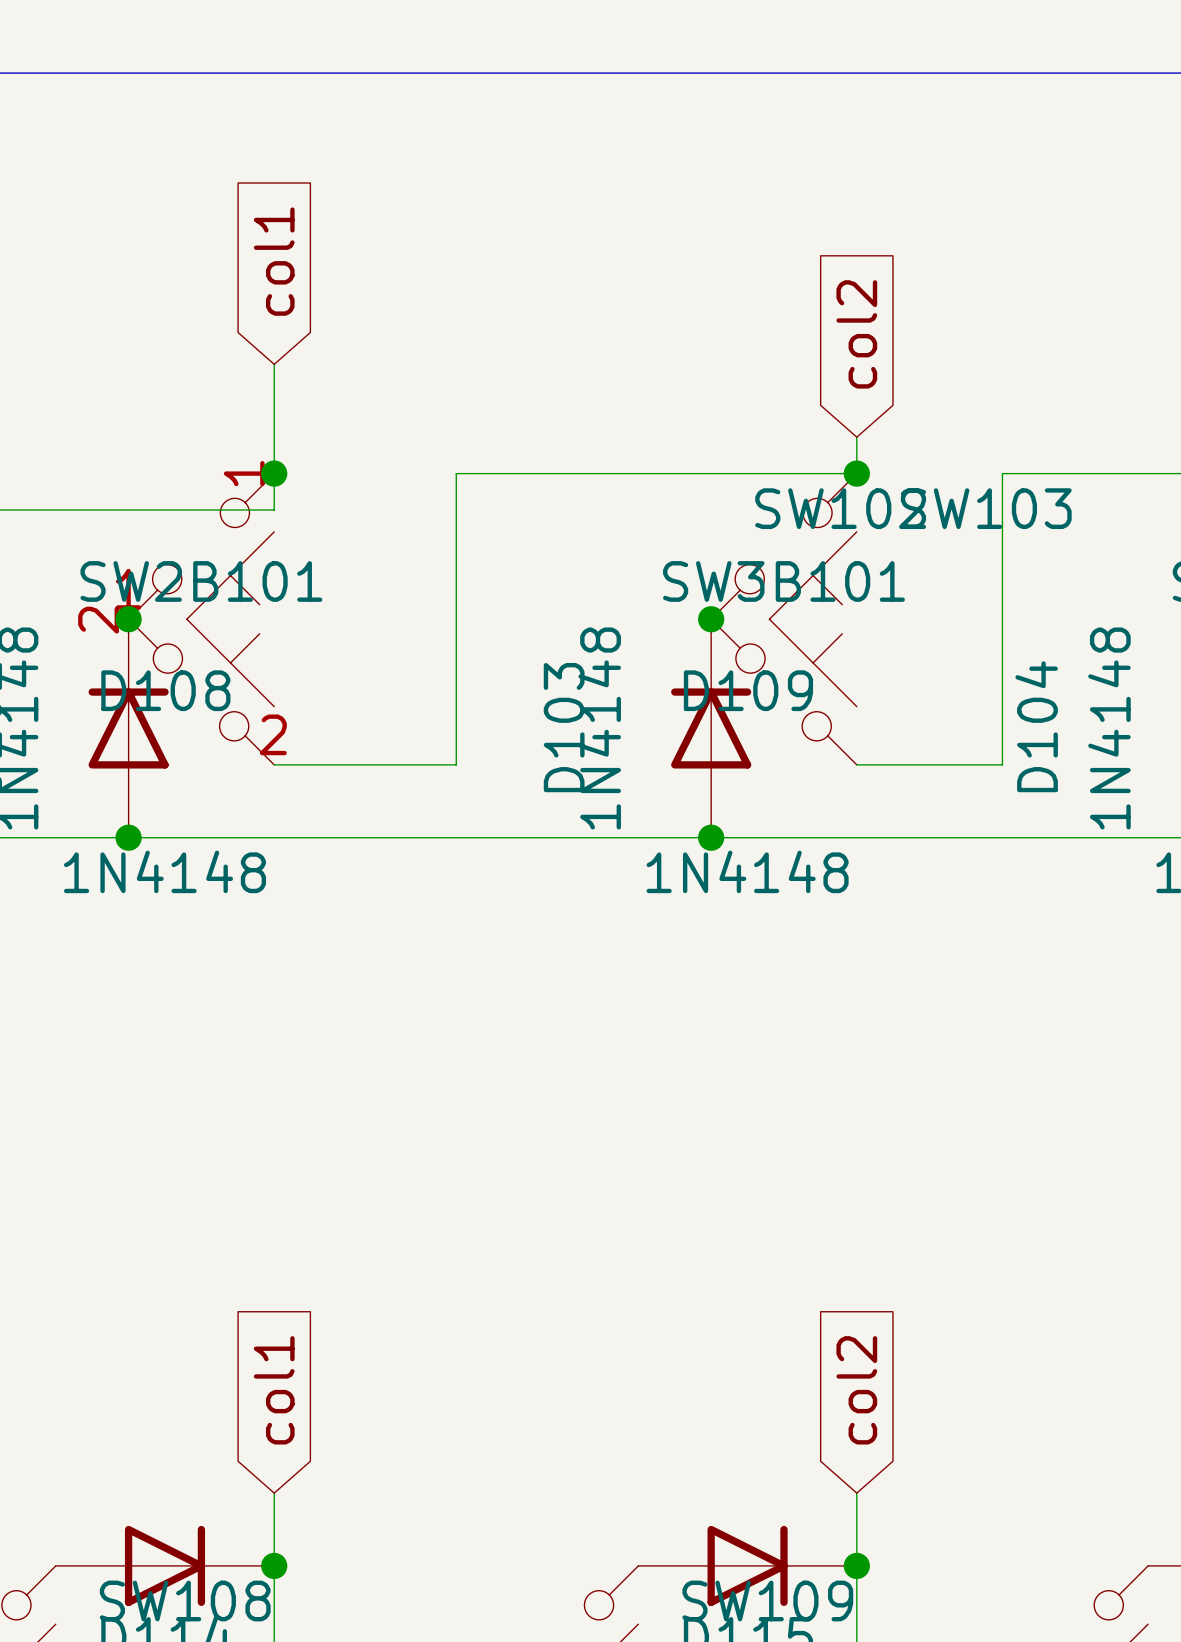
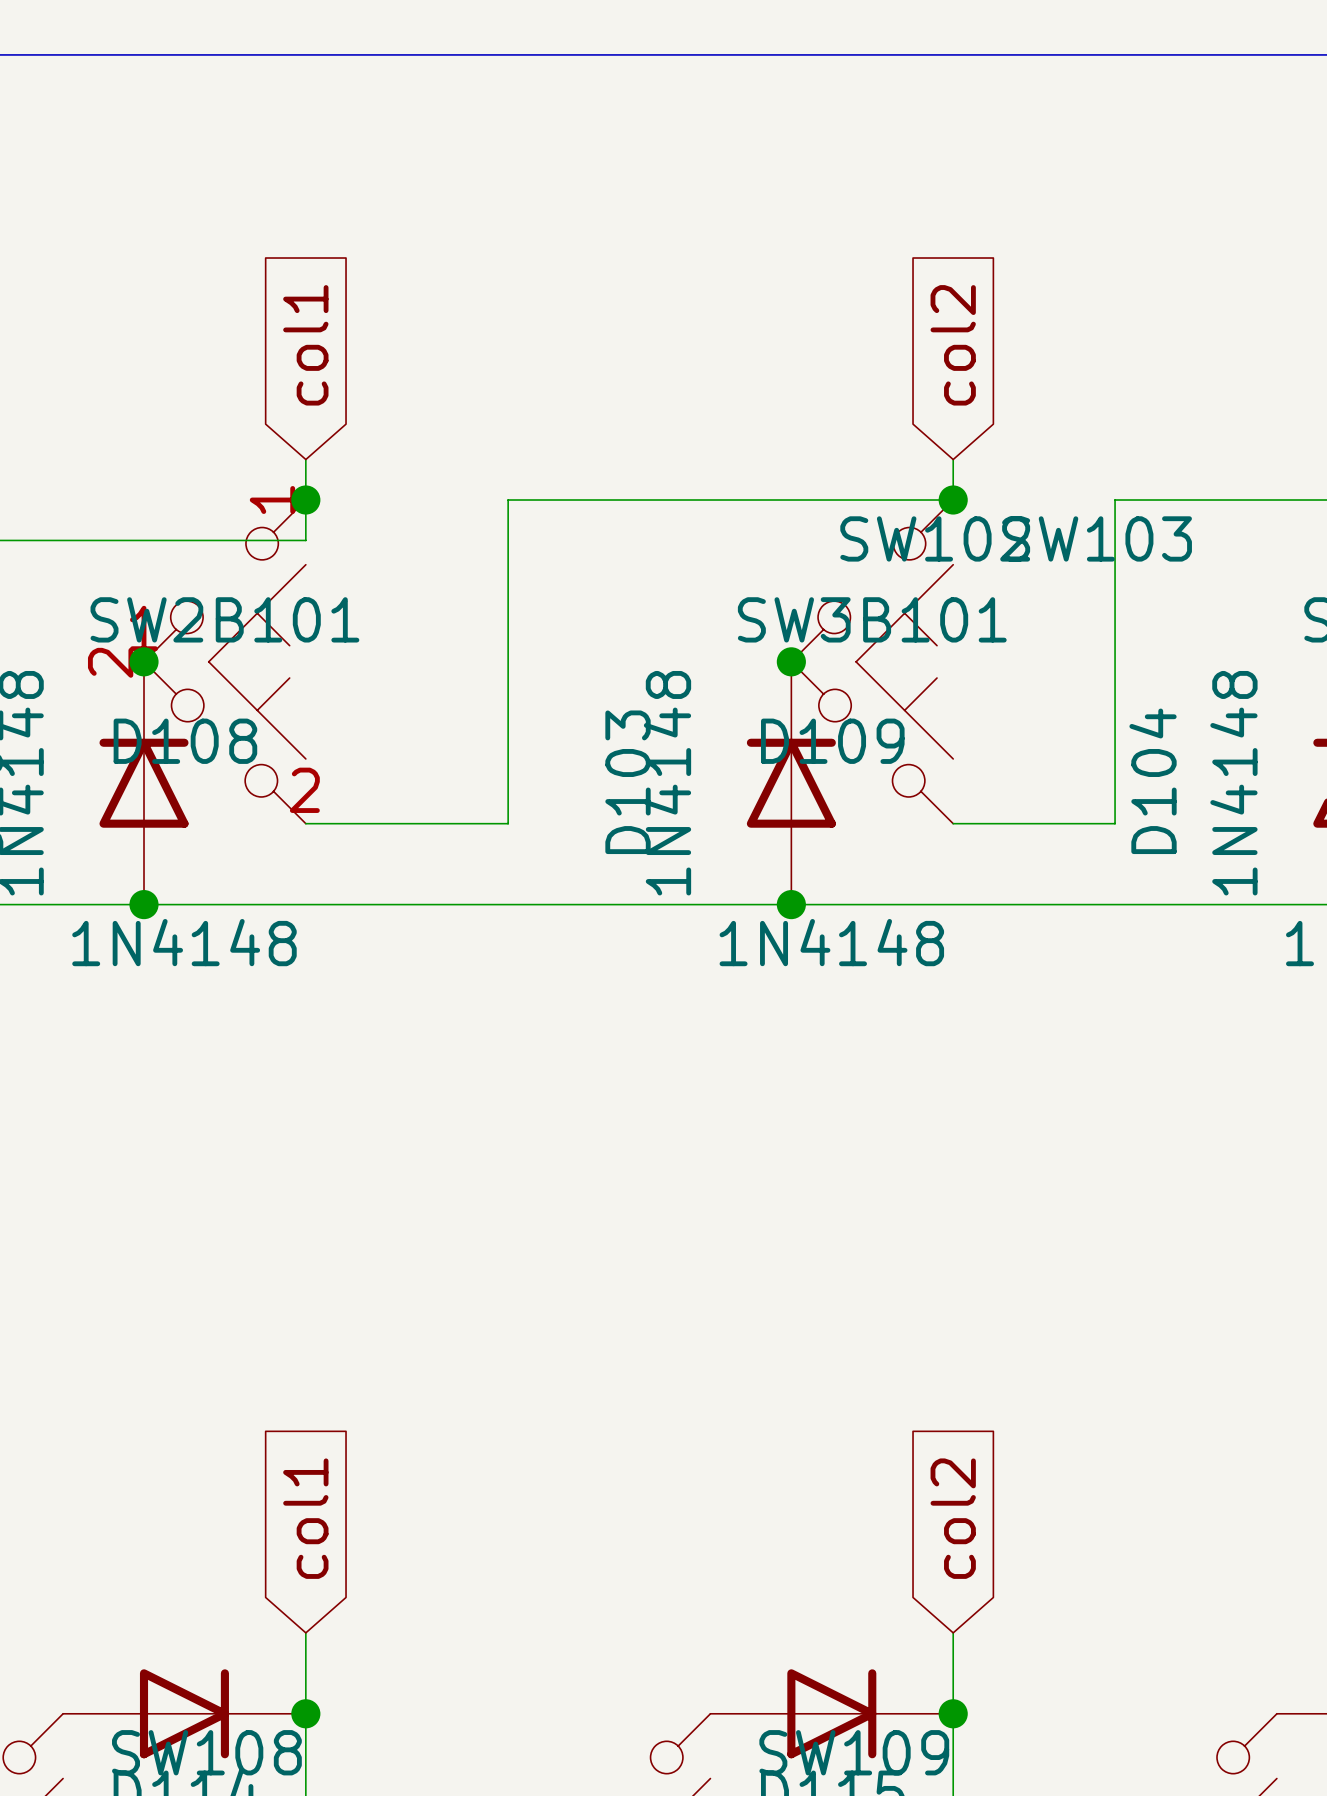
global label position: col1 (274, 261) -> col1 (305, 345)
wire: (274, 364) (274, 437) -> none

